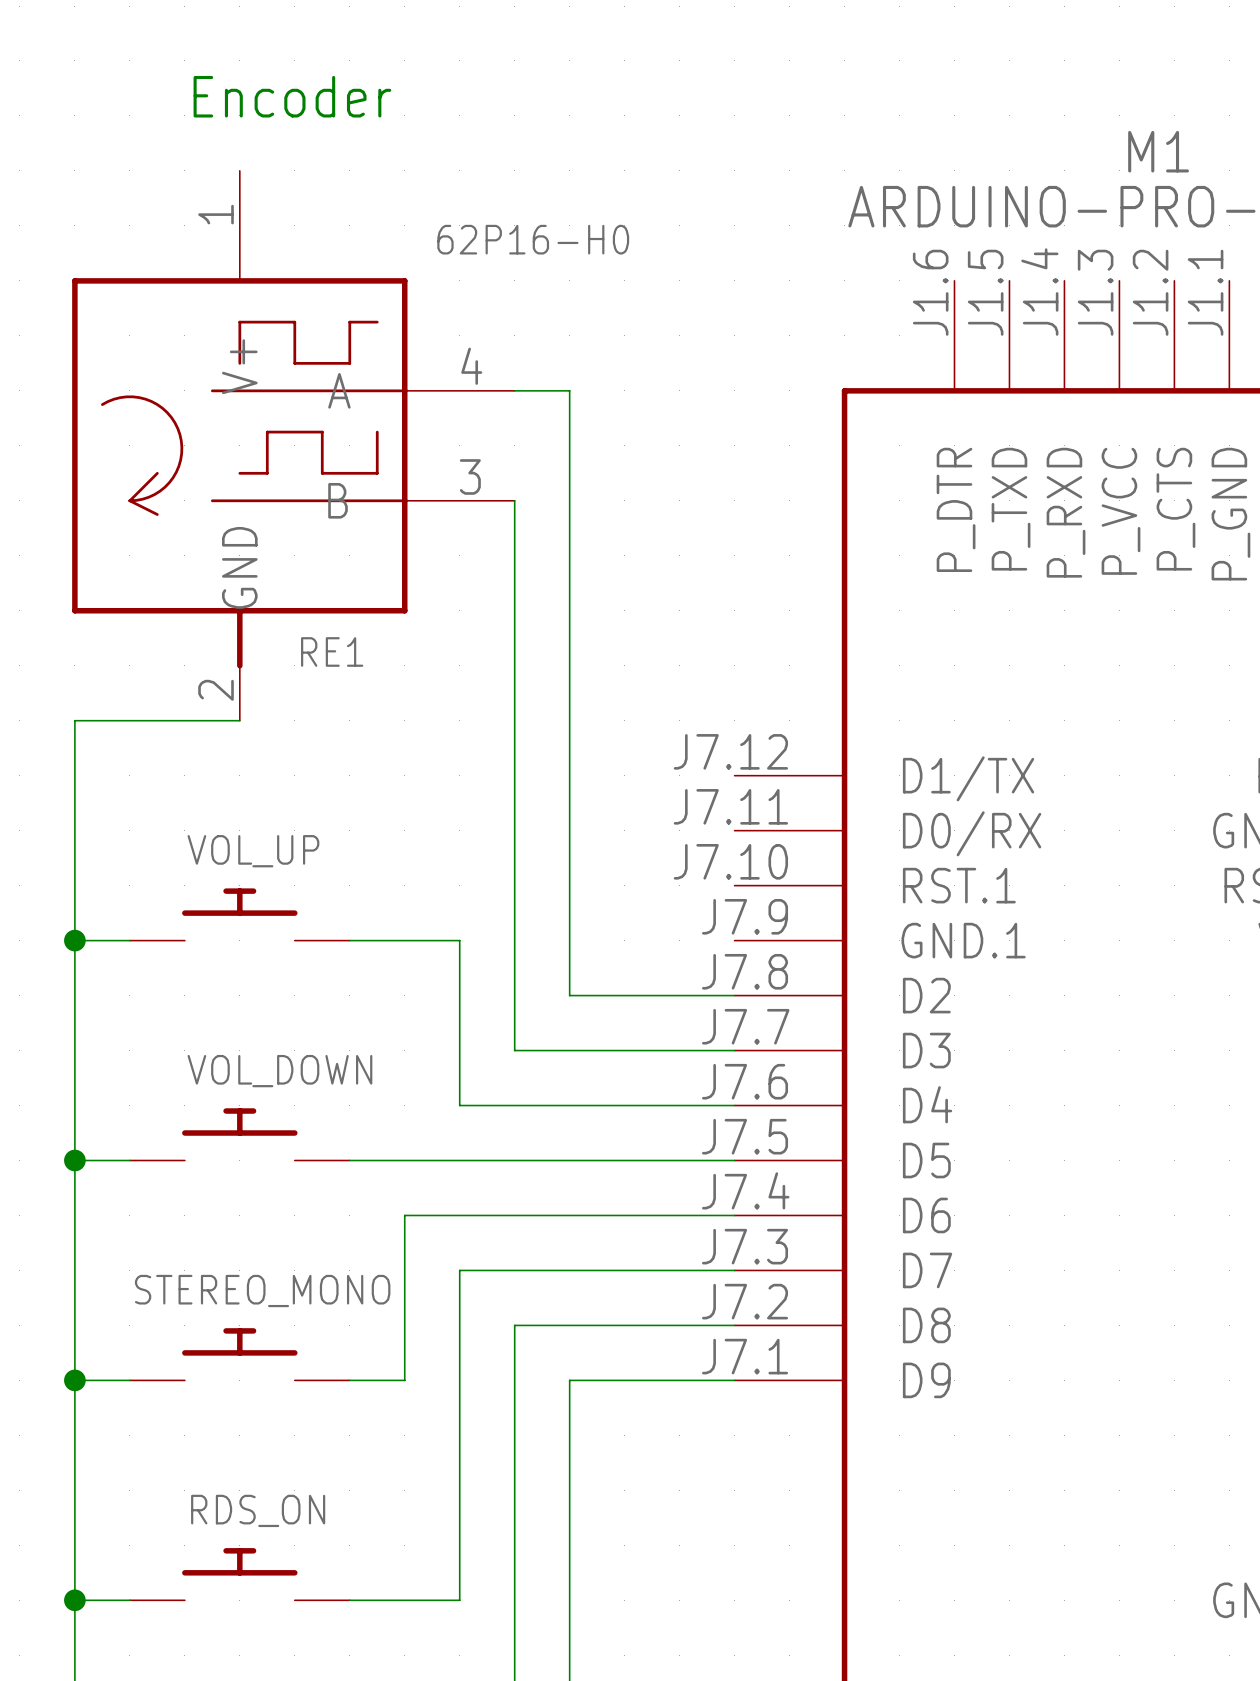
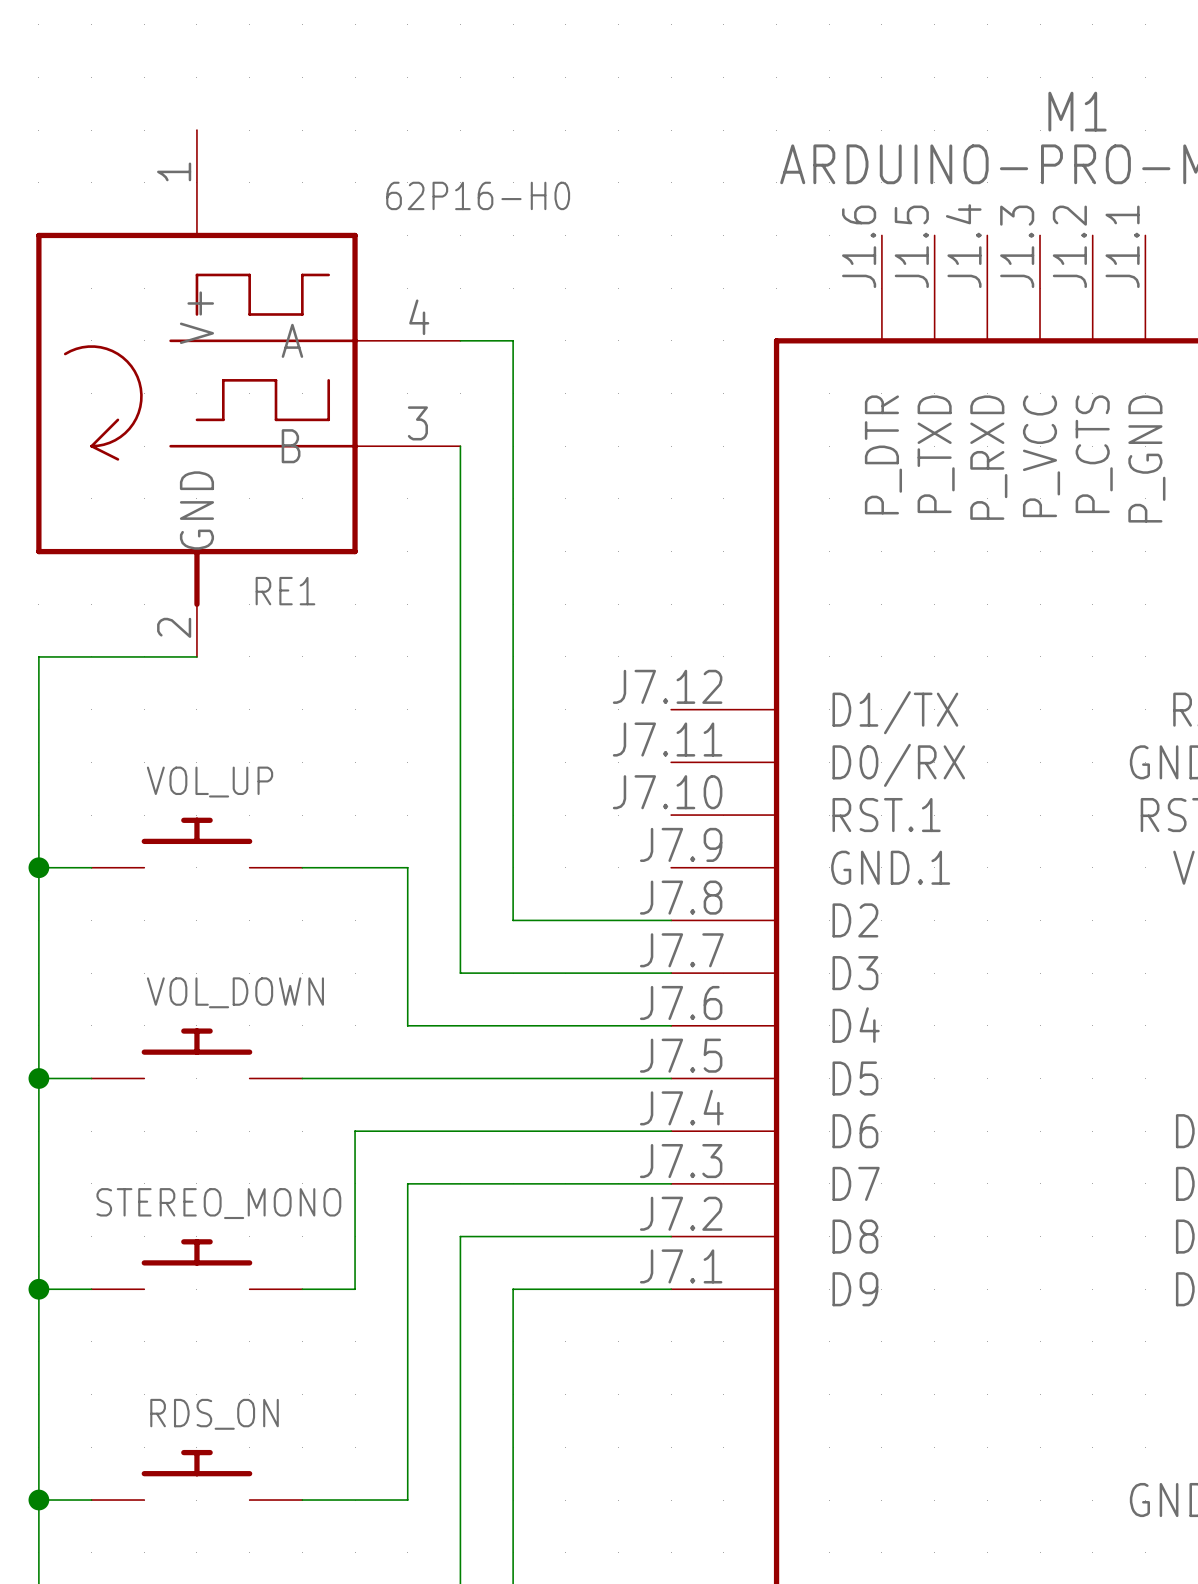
text: Encoder (292, 96) -> none

